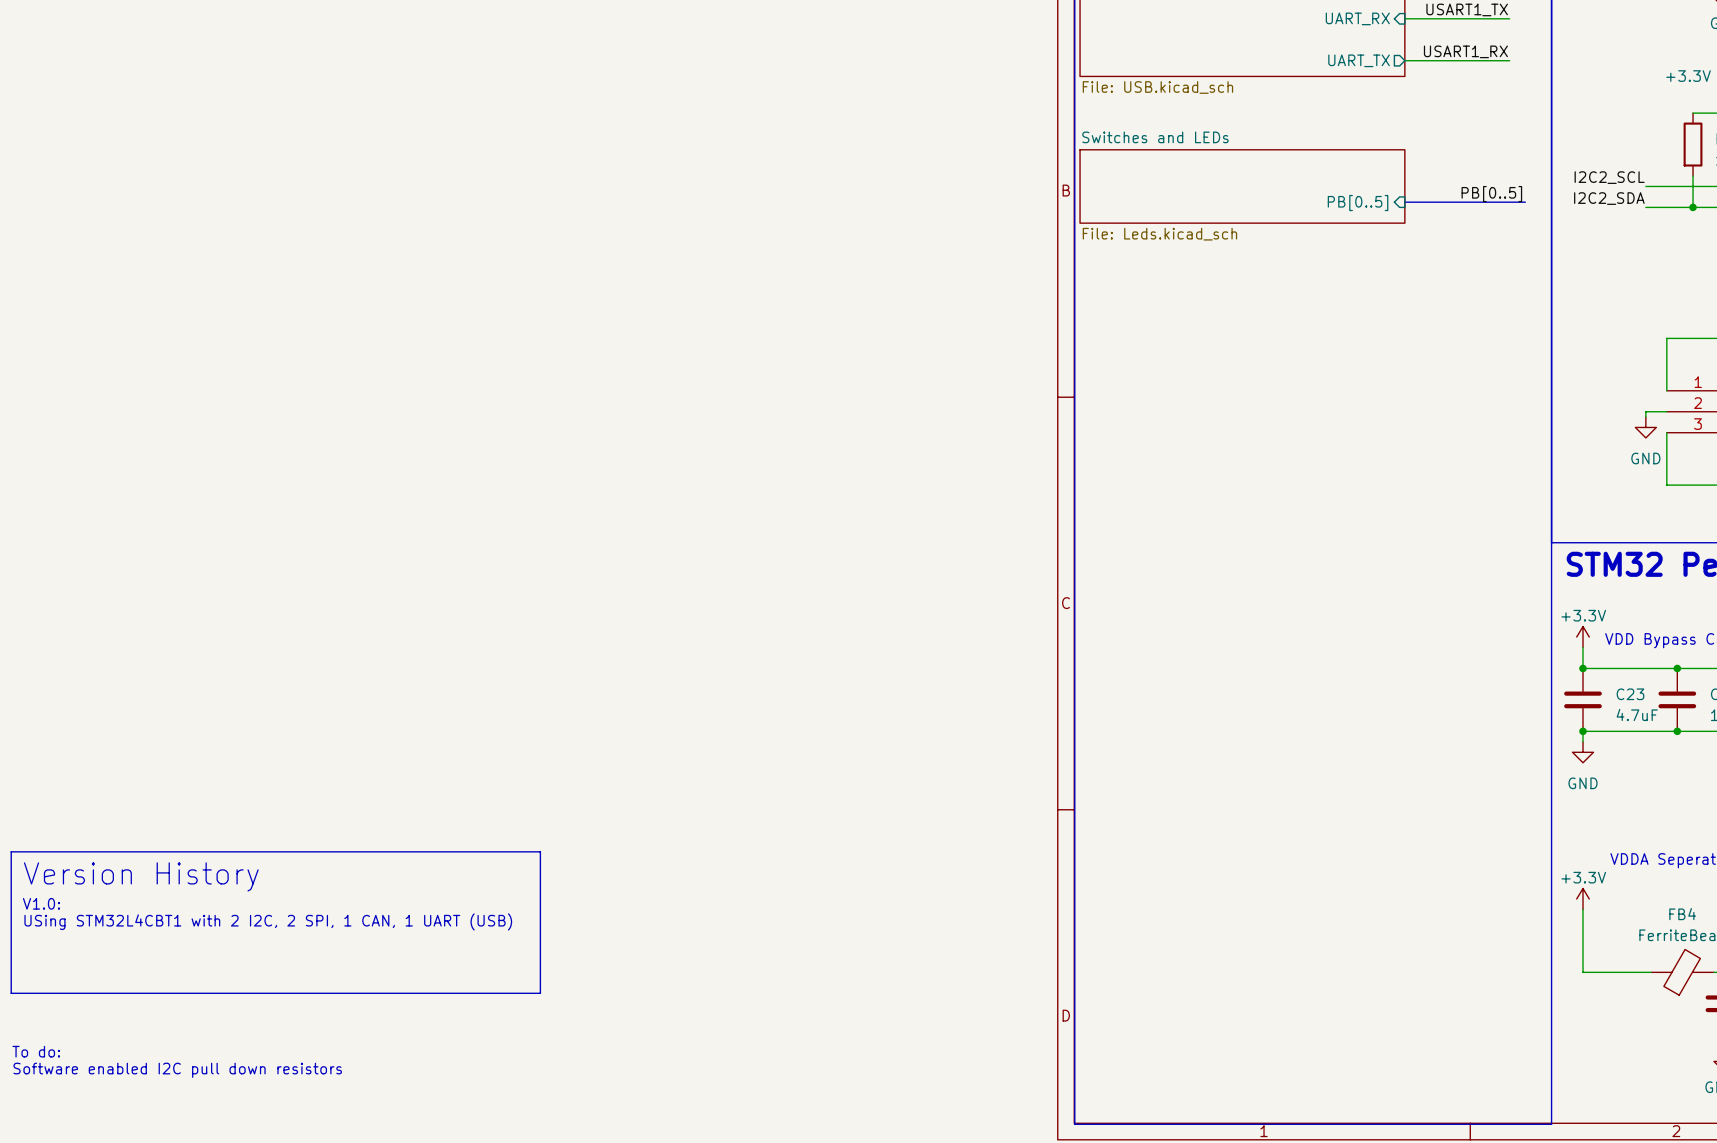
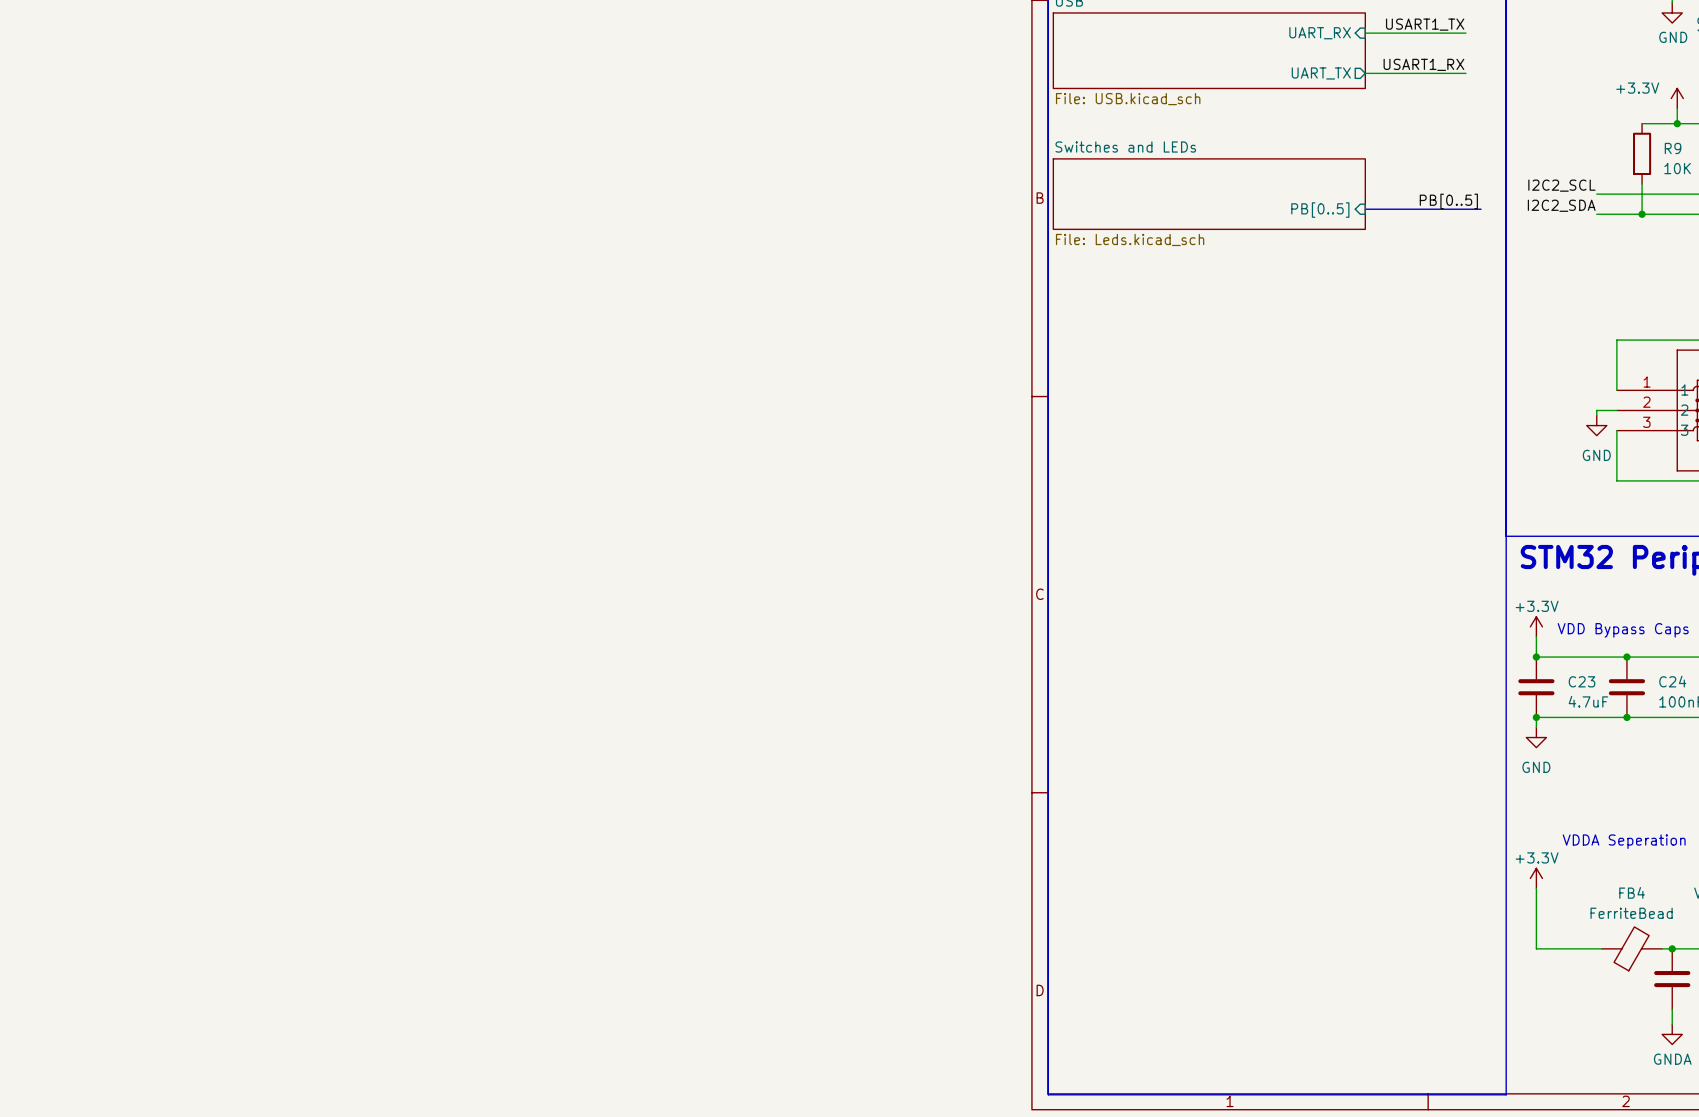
line: (11, 851) (540, 851) (540, 993) (11, 993) (11, 851) -> none
text: Version History (141, 876) -> none
text: V1.0: (41, 903) -> none
text: USing STM32L4CBT1 with 2 I2C, 2 SPI, 1 CAN, 1 UART (USB) (268, 921) -> none
text: To do: (36, 1051) -> none
text: Software enabled I2C pull down resistors (177, 1070) -> none

